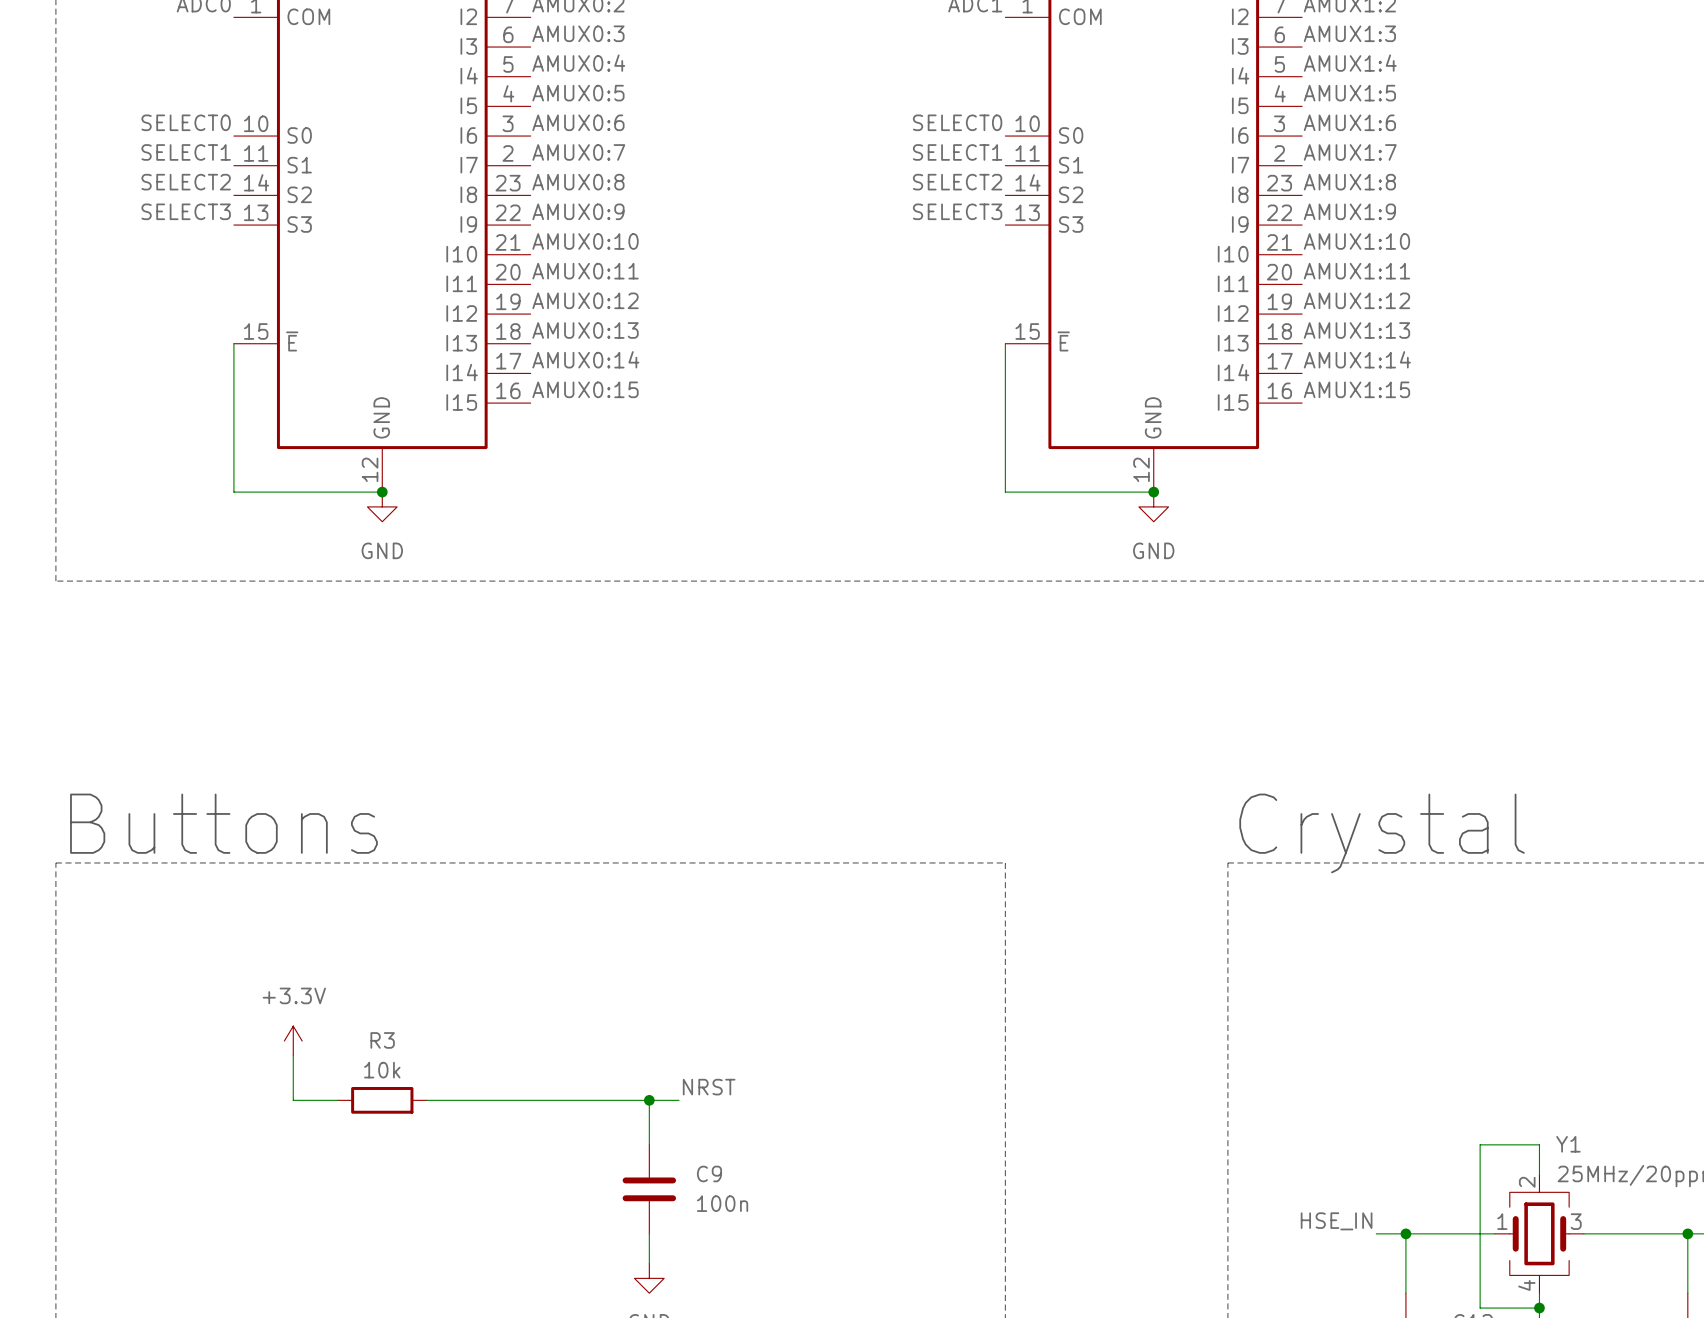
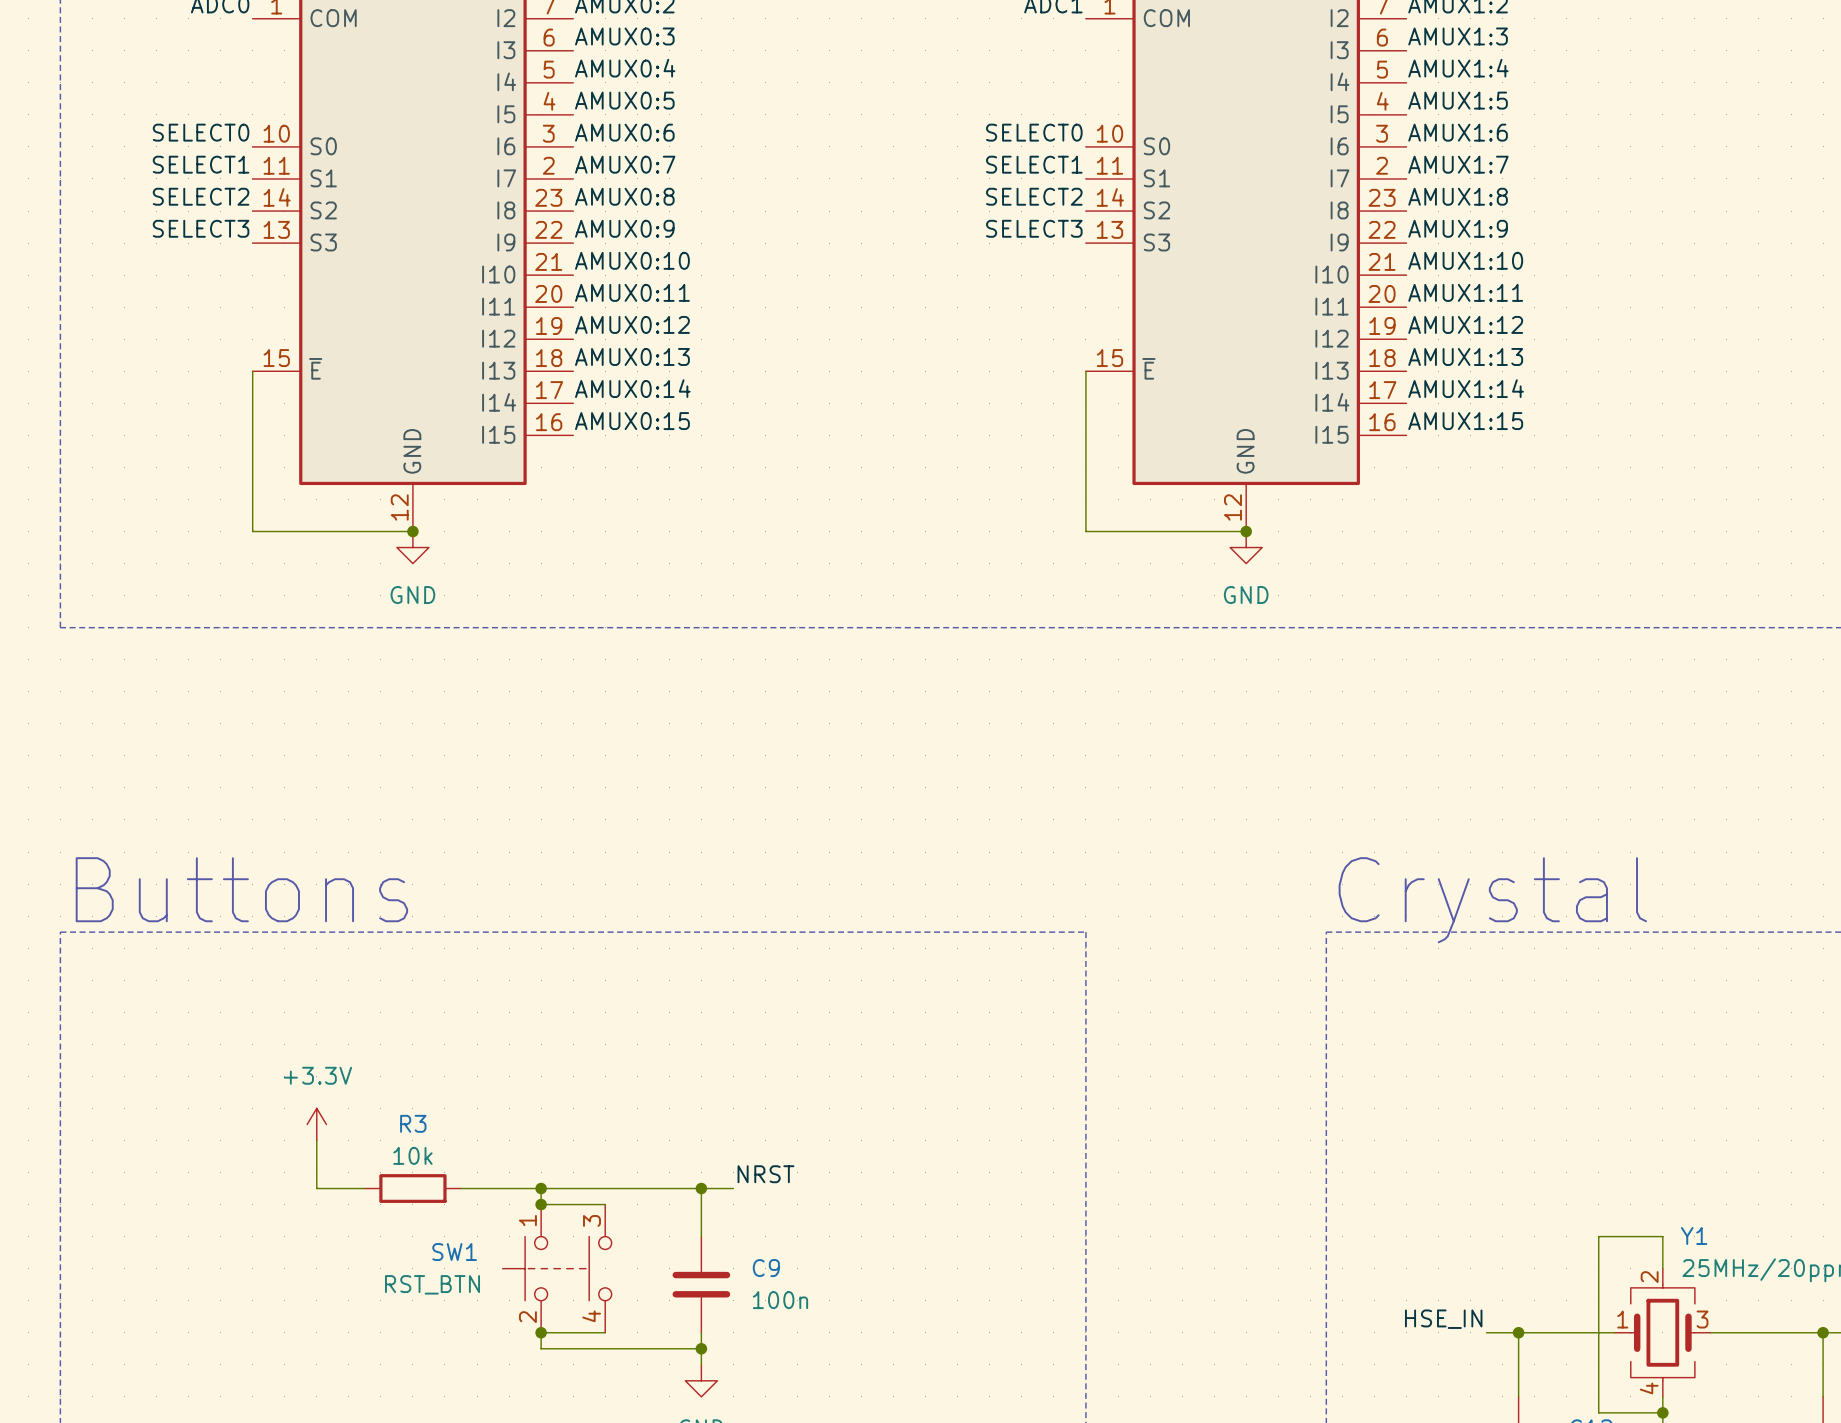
wire: none -> (541, 1188) (541, 1204) (605, 1204)
junction: none -> (541, 1188)
junction: none -> (541, 1204)
SW1: none -> RST_BTN (557, 1268)
junction: none -> (541, 1332)
wire: none -> (605, 1332) (541, 1332) (541, 1348) (701, 1348)
junction: none -> (701, 1348)

